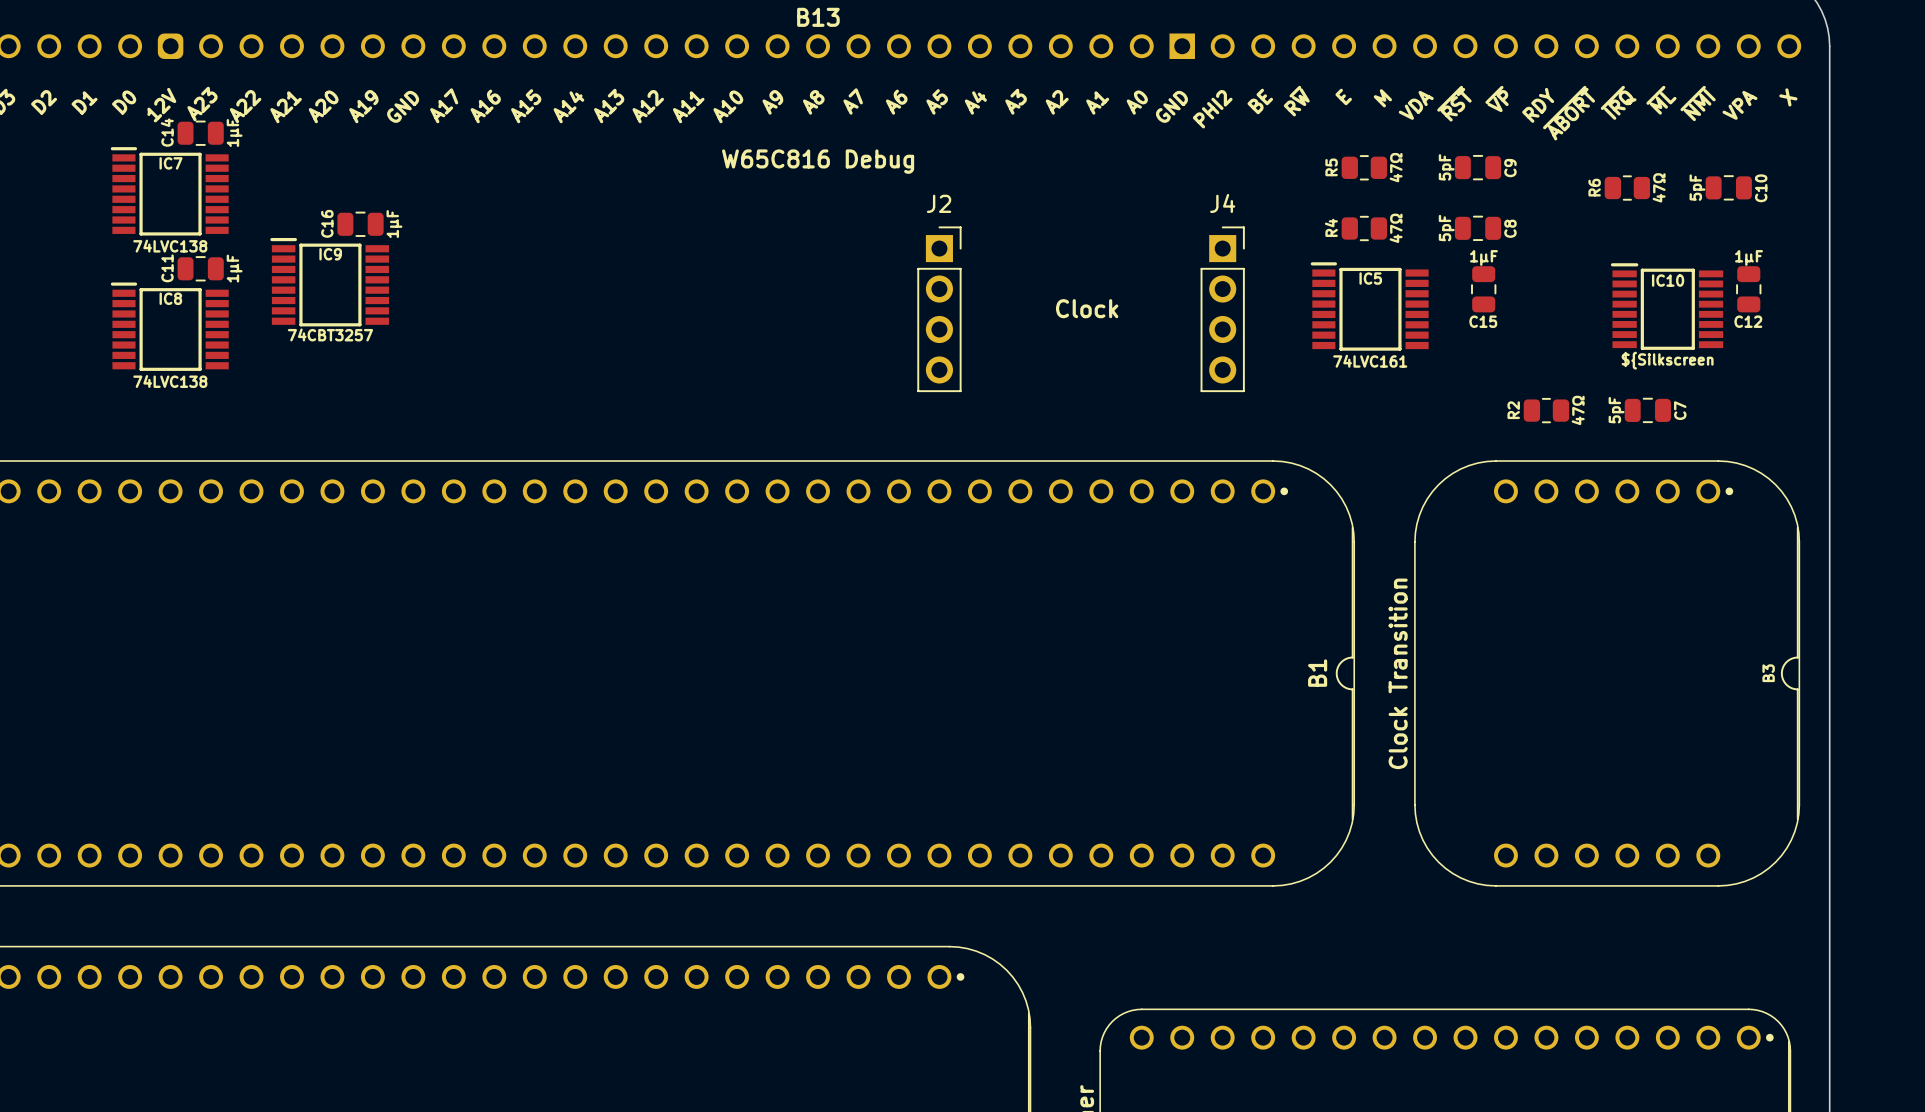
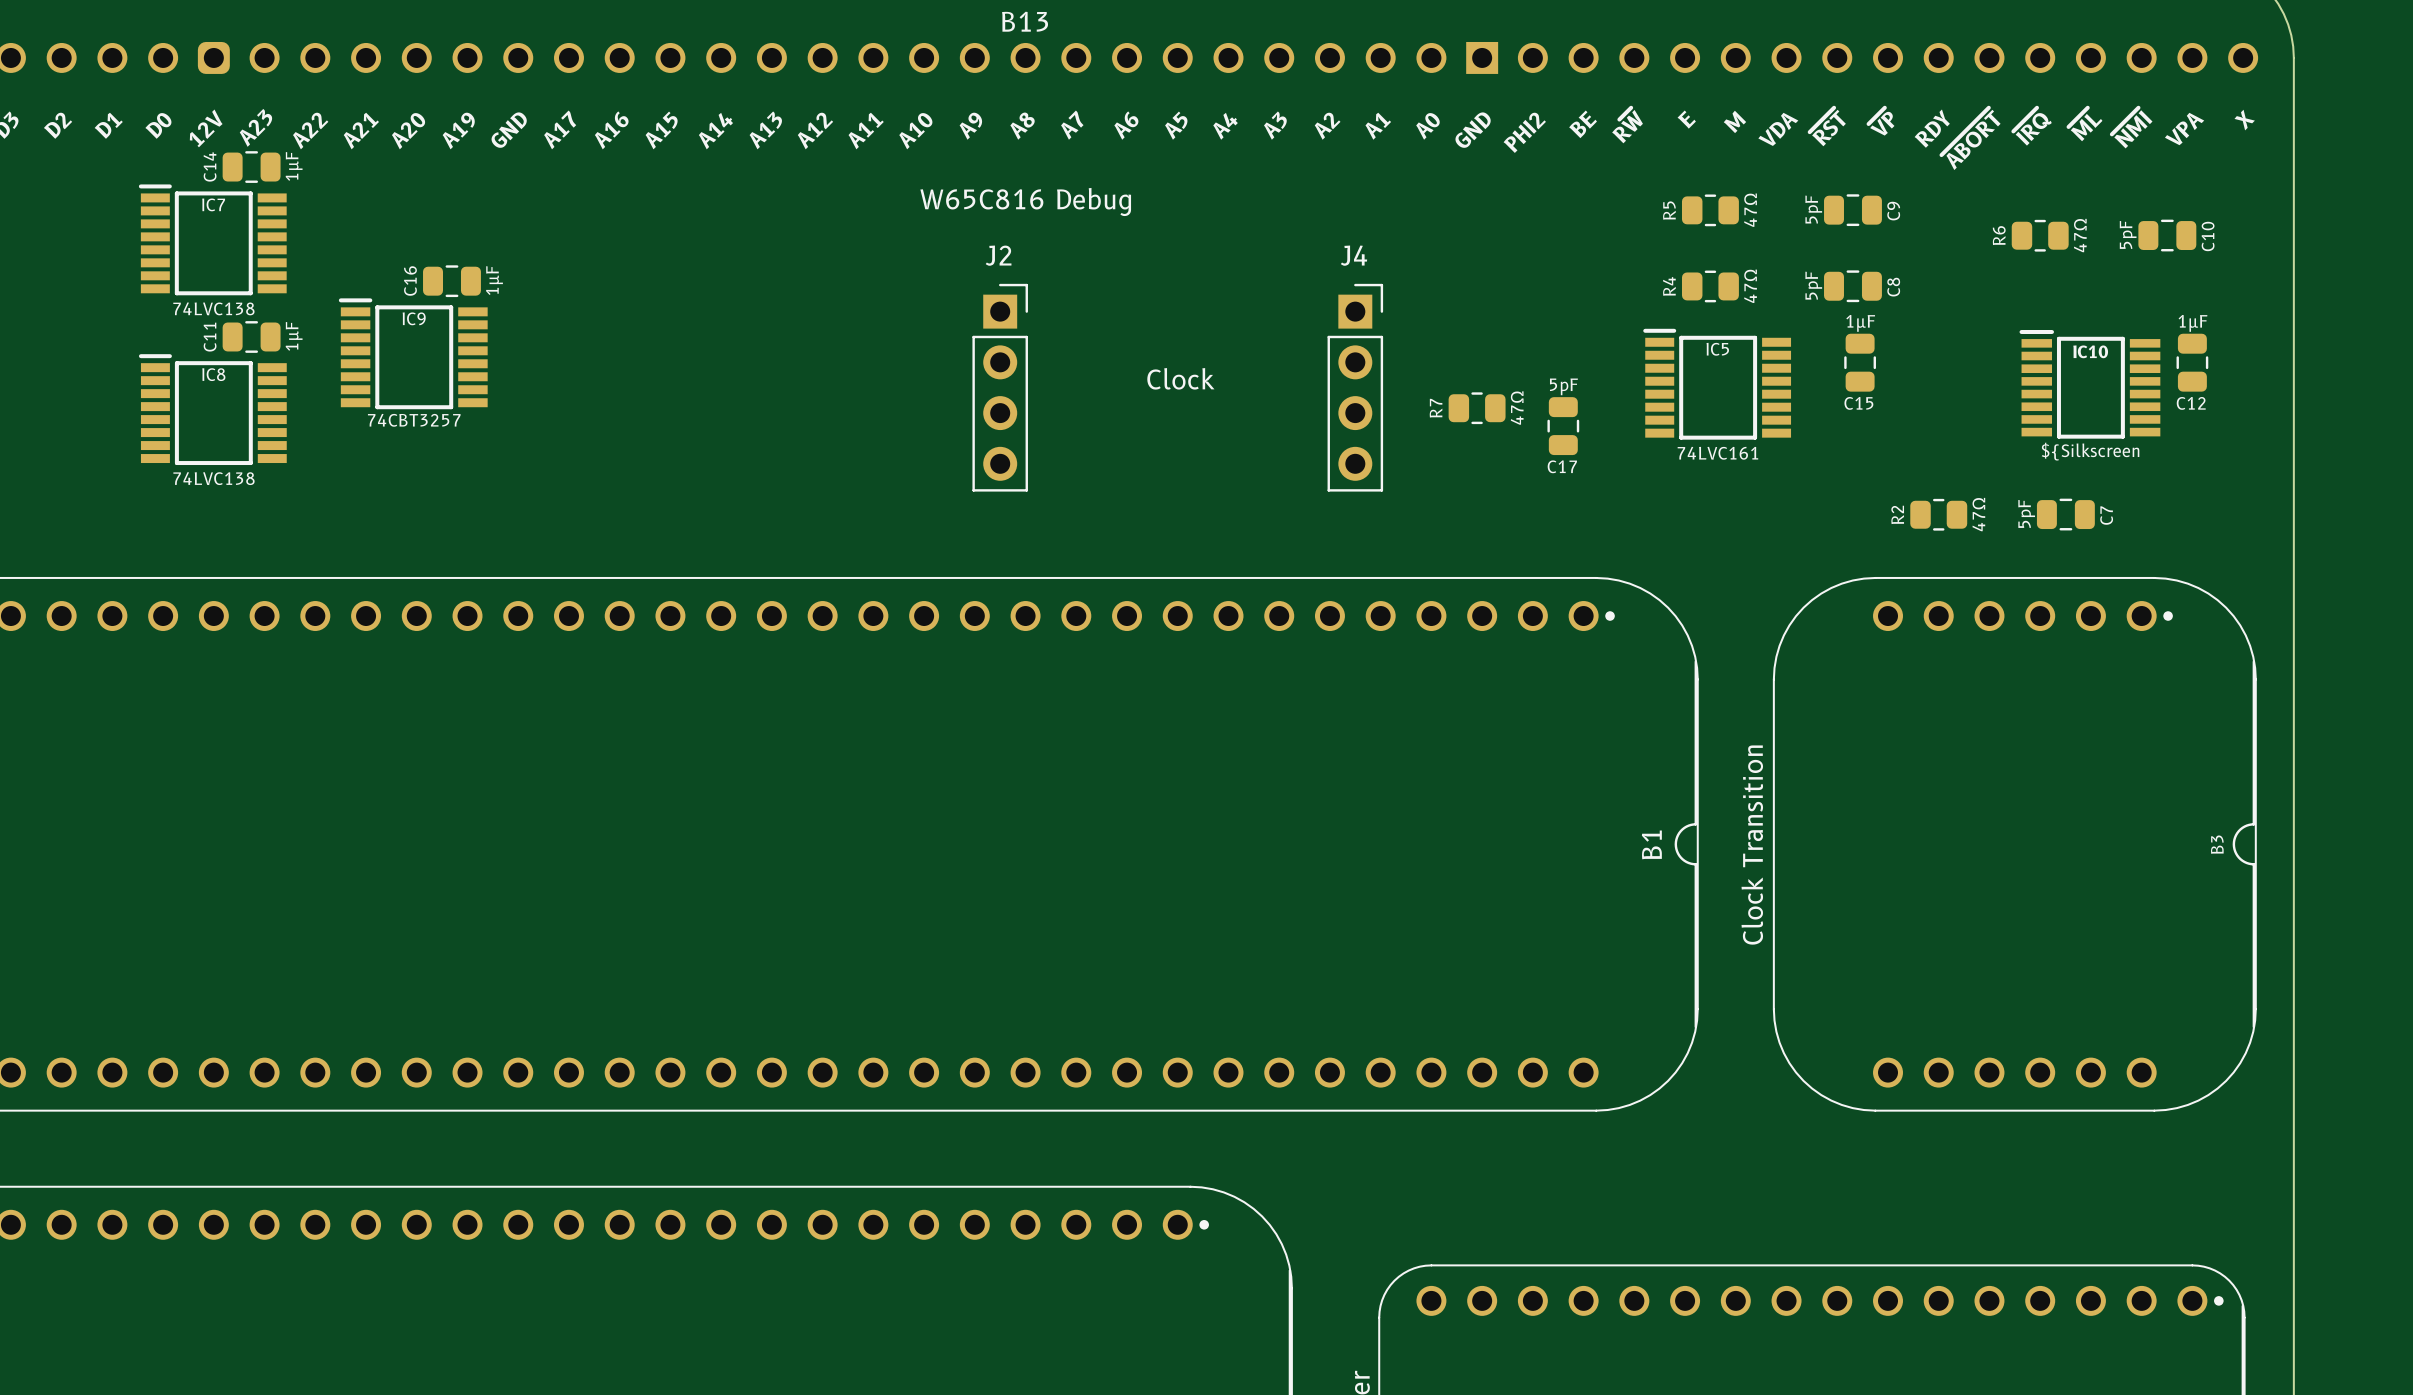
text position: Clock (1087, 308) -> Clock (1180, 378)
J2 position: (939, 309) -> (1000, 387)
J4 position: (1222, 309) -> (1355, 387)
R7: none -> 47Ω (1477, 408)
C17: none -> 5pF (1563, 426)

